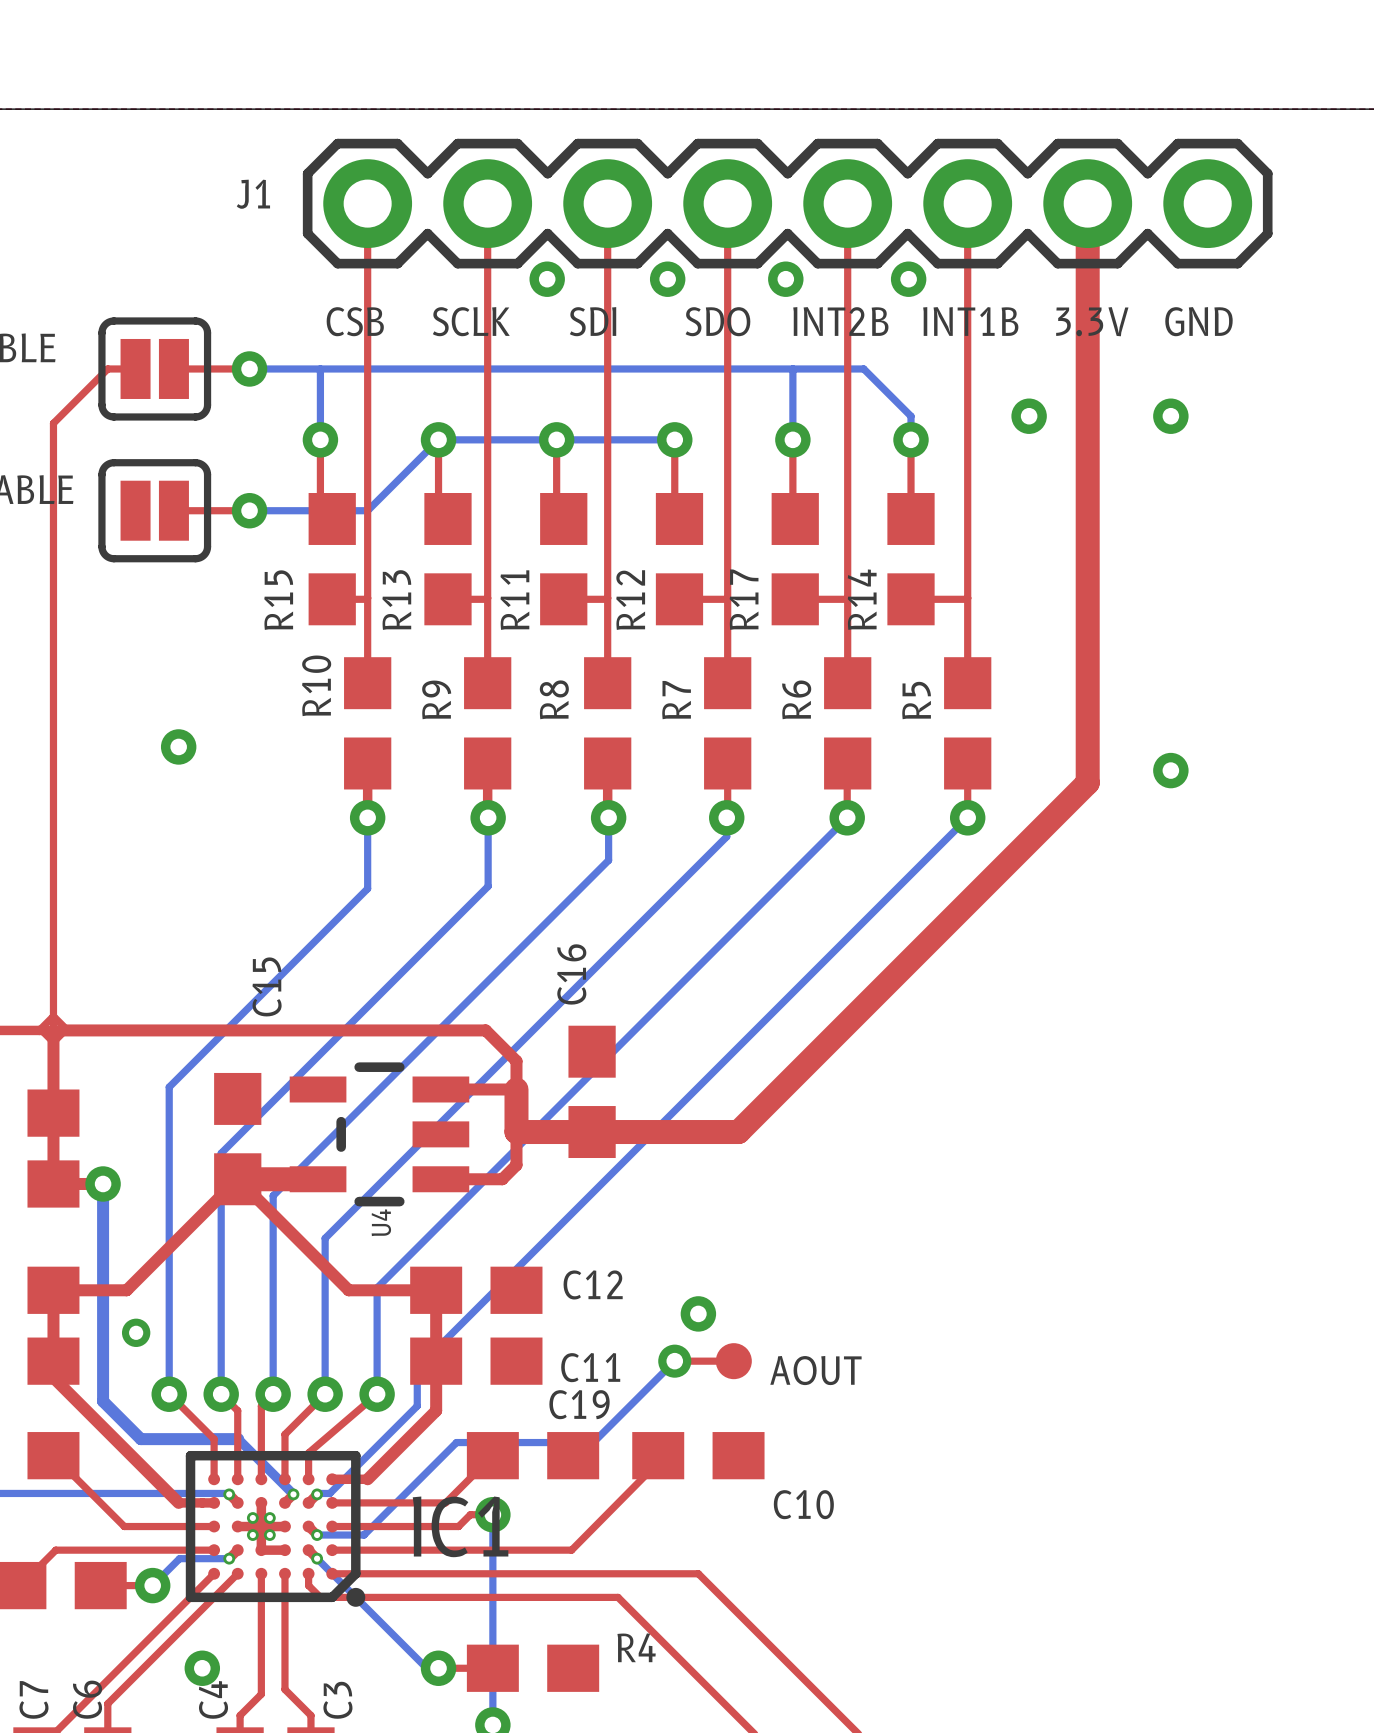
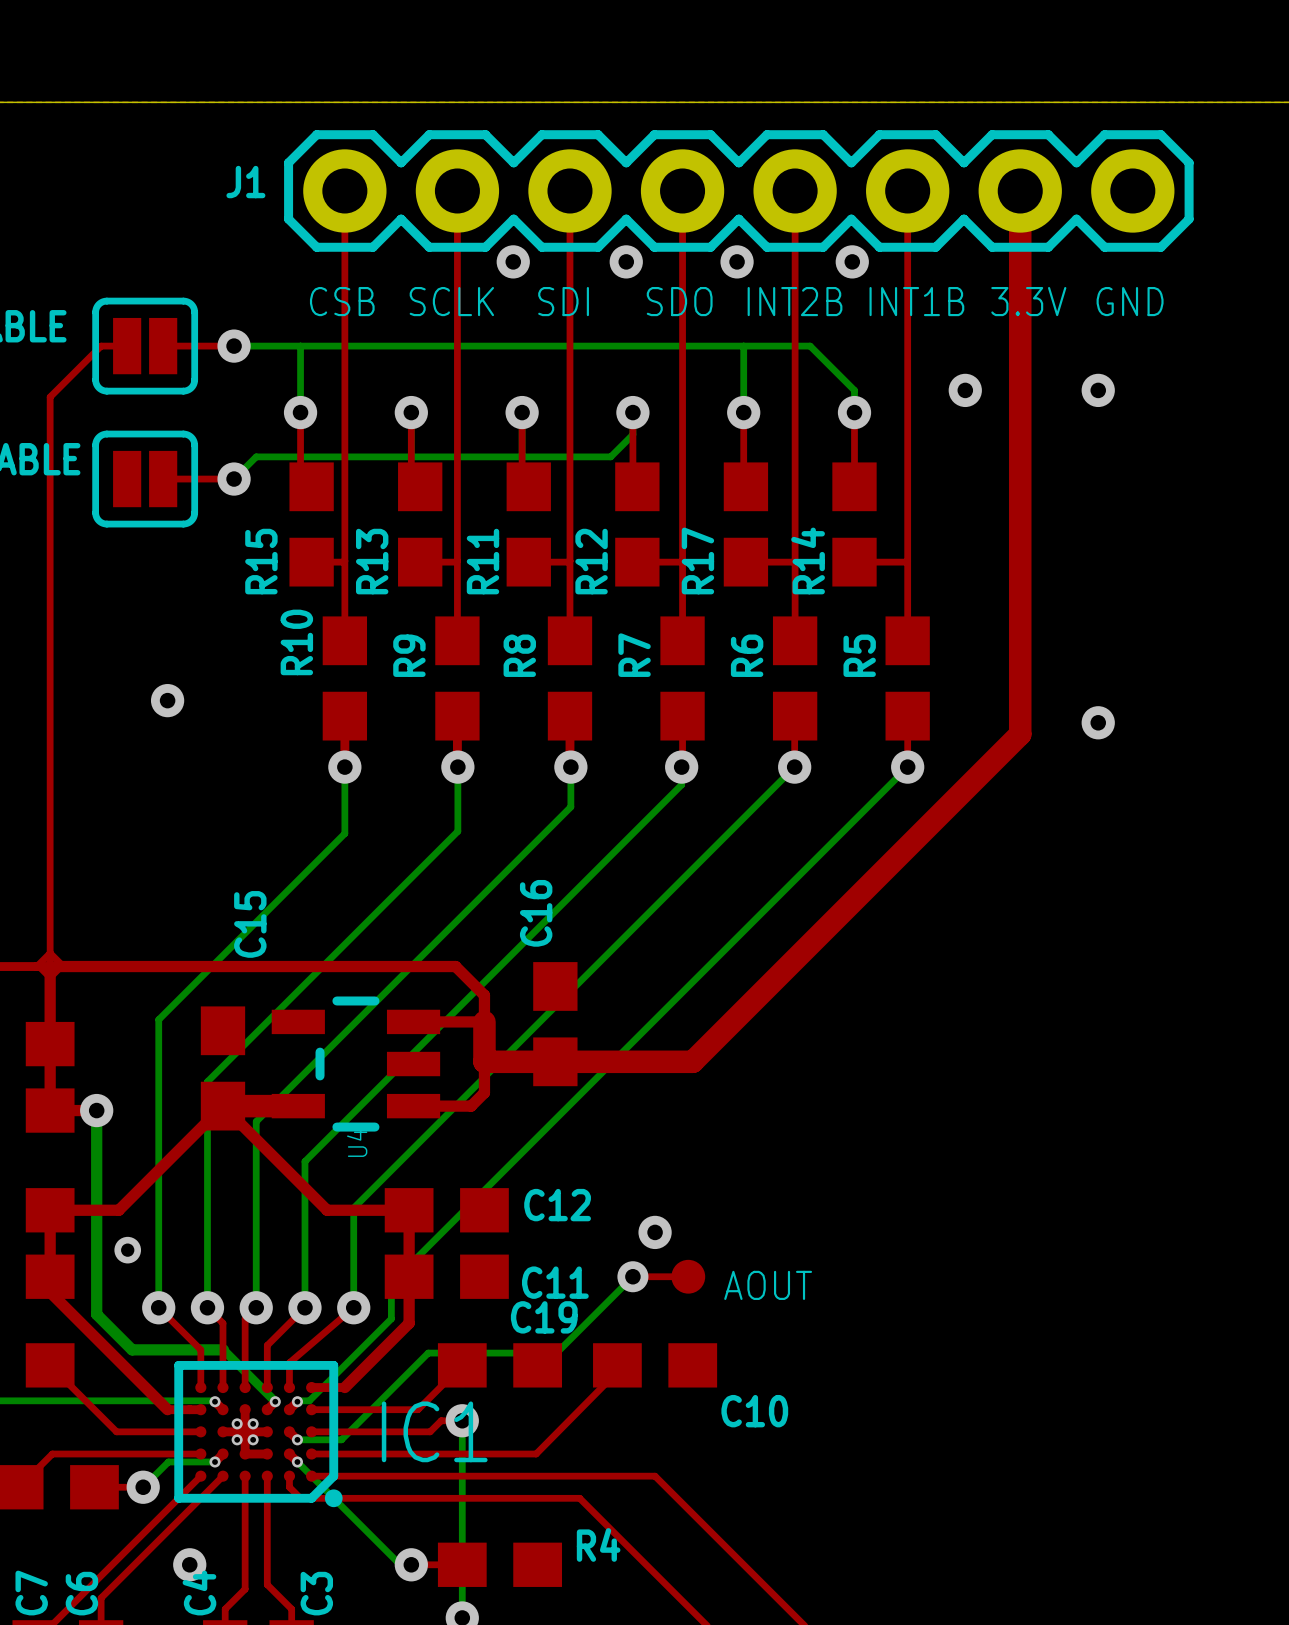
bottom track: (674, 439) (438, 439) (367, 510) (249, 510) -> (632, 412) (632, 434) (610, 456) (256, 456) (234, 479)

